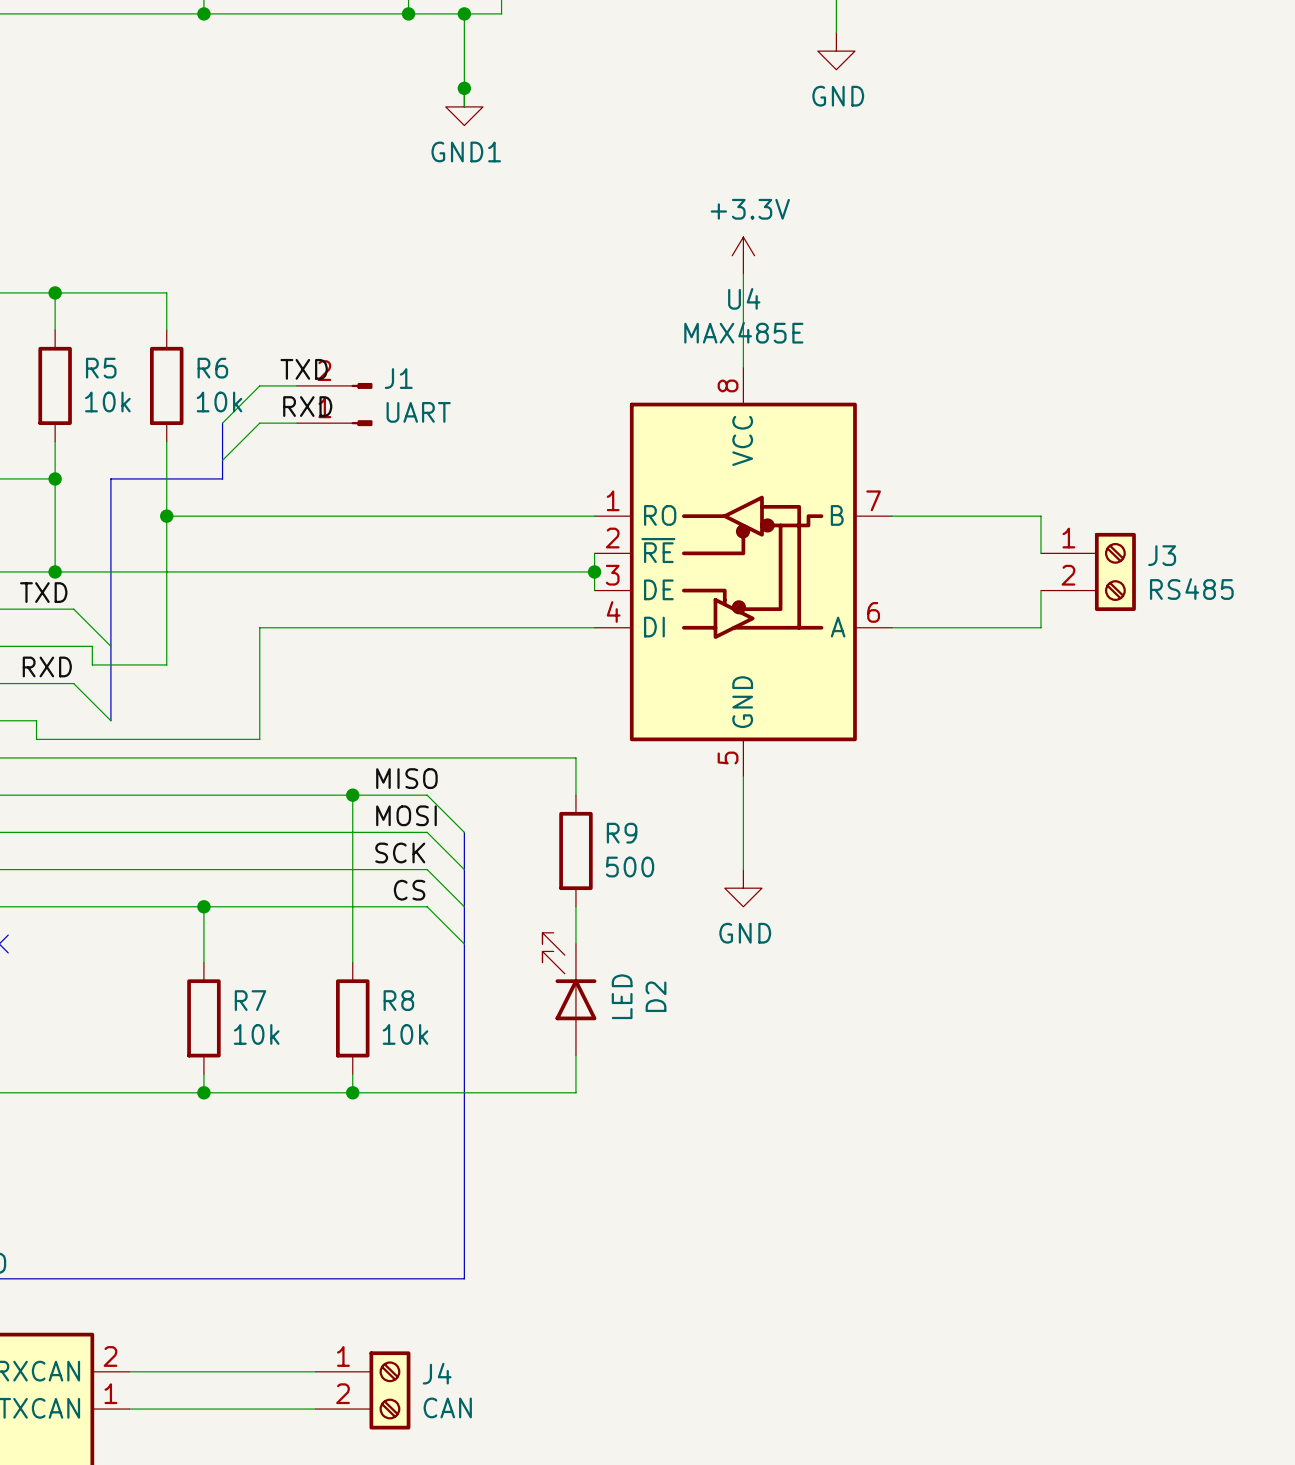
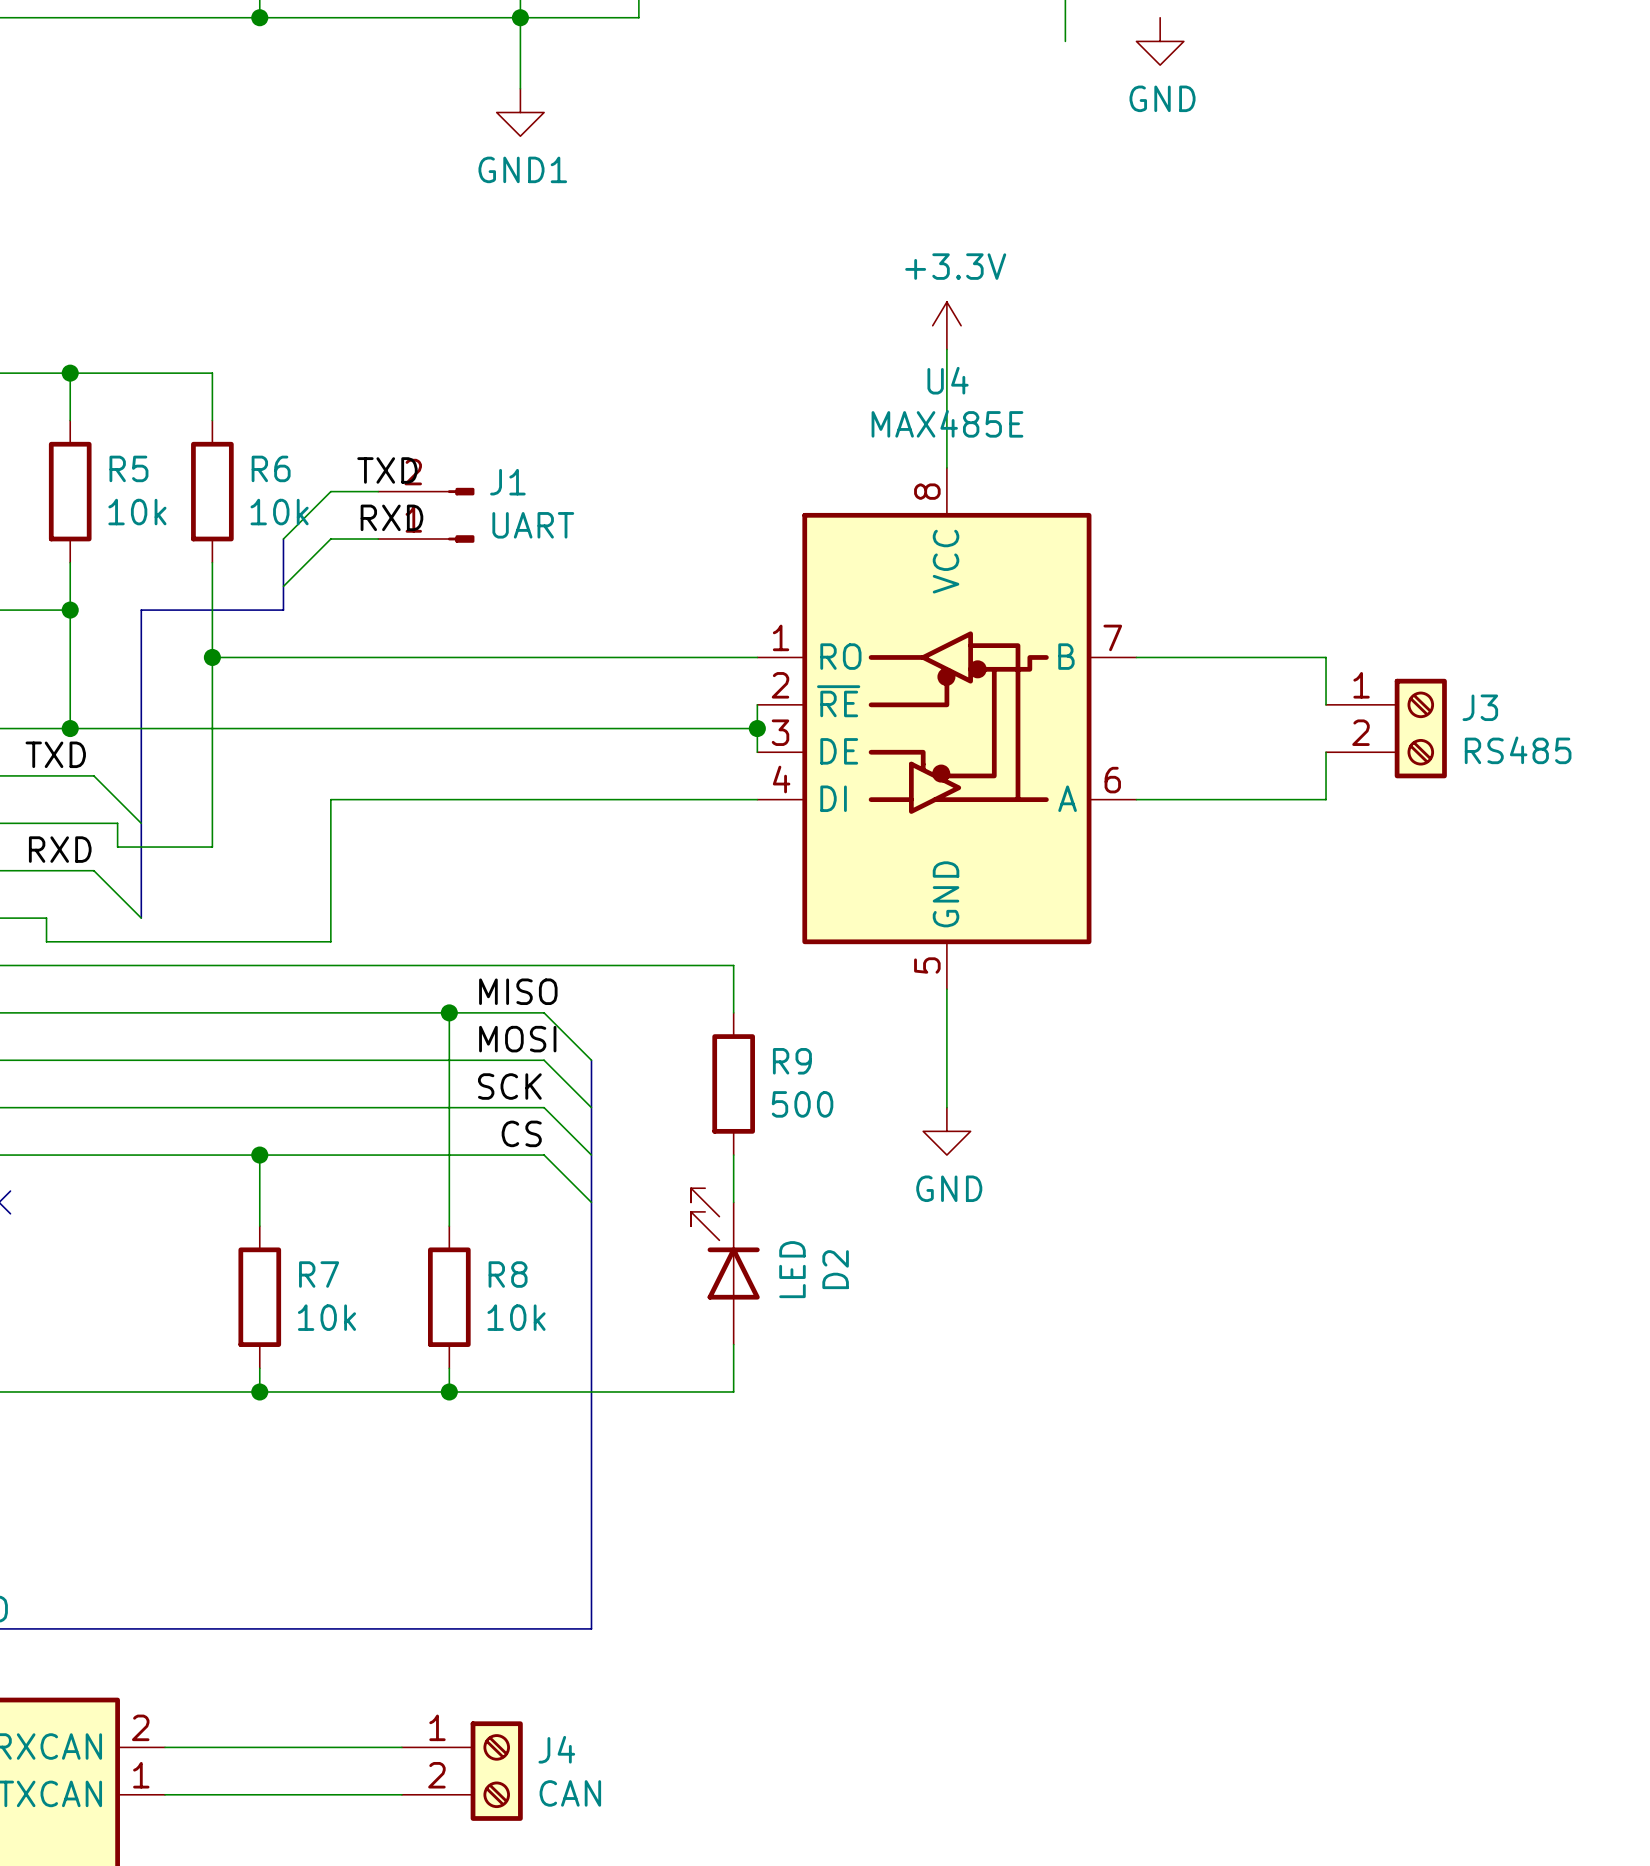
wire: none -> (520, 17) (520, 88)
wire: (464, 13) (464, 106) -> none
junction: (464, 13) -> none
power symbol position: GND (836, 51) -> GND (1160, 41)
junction: (464, 88) -> none
power symbol position: GND1 (464, 106) -> GND1 (520, 112)

